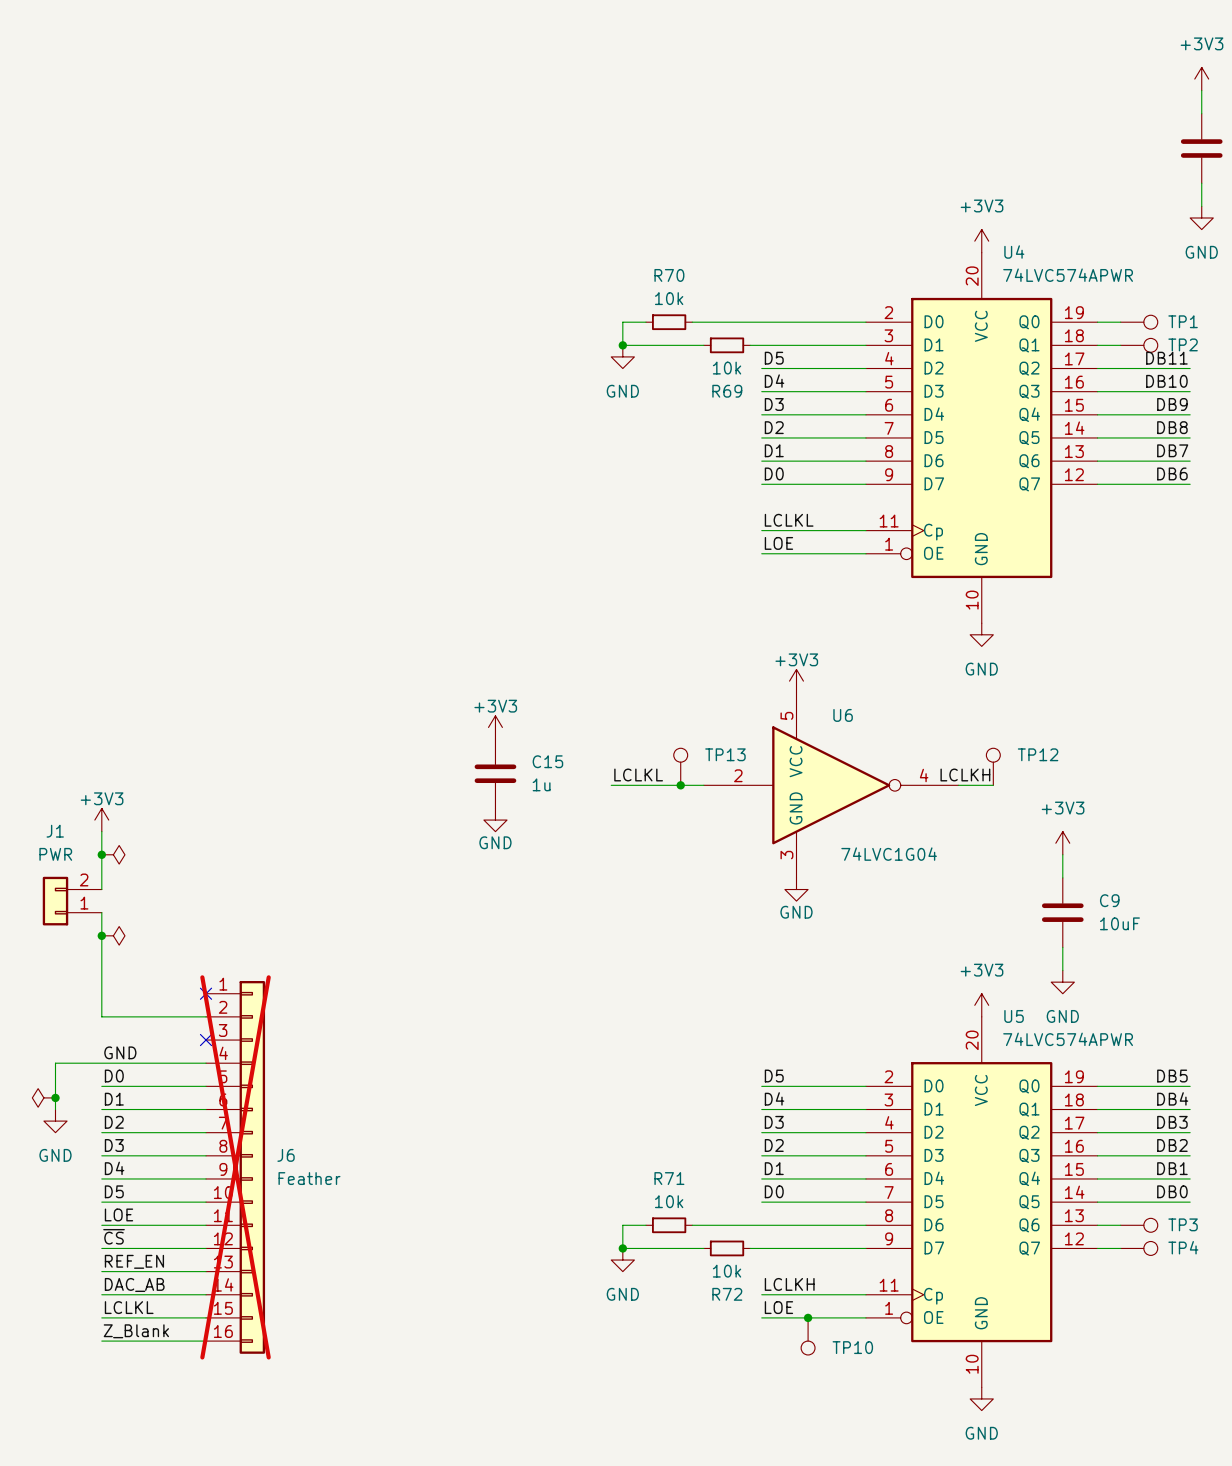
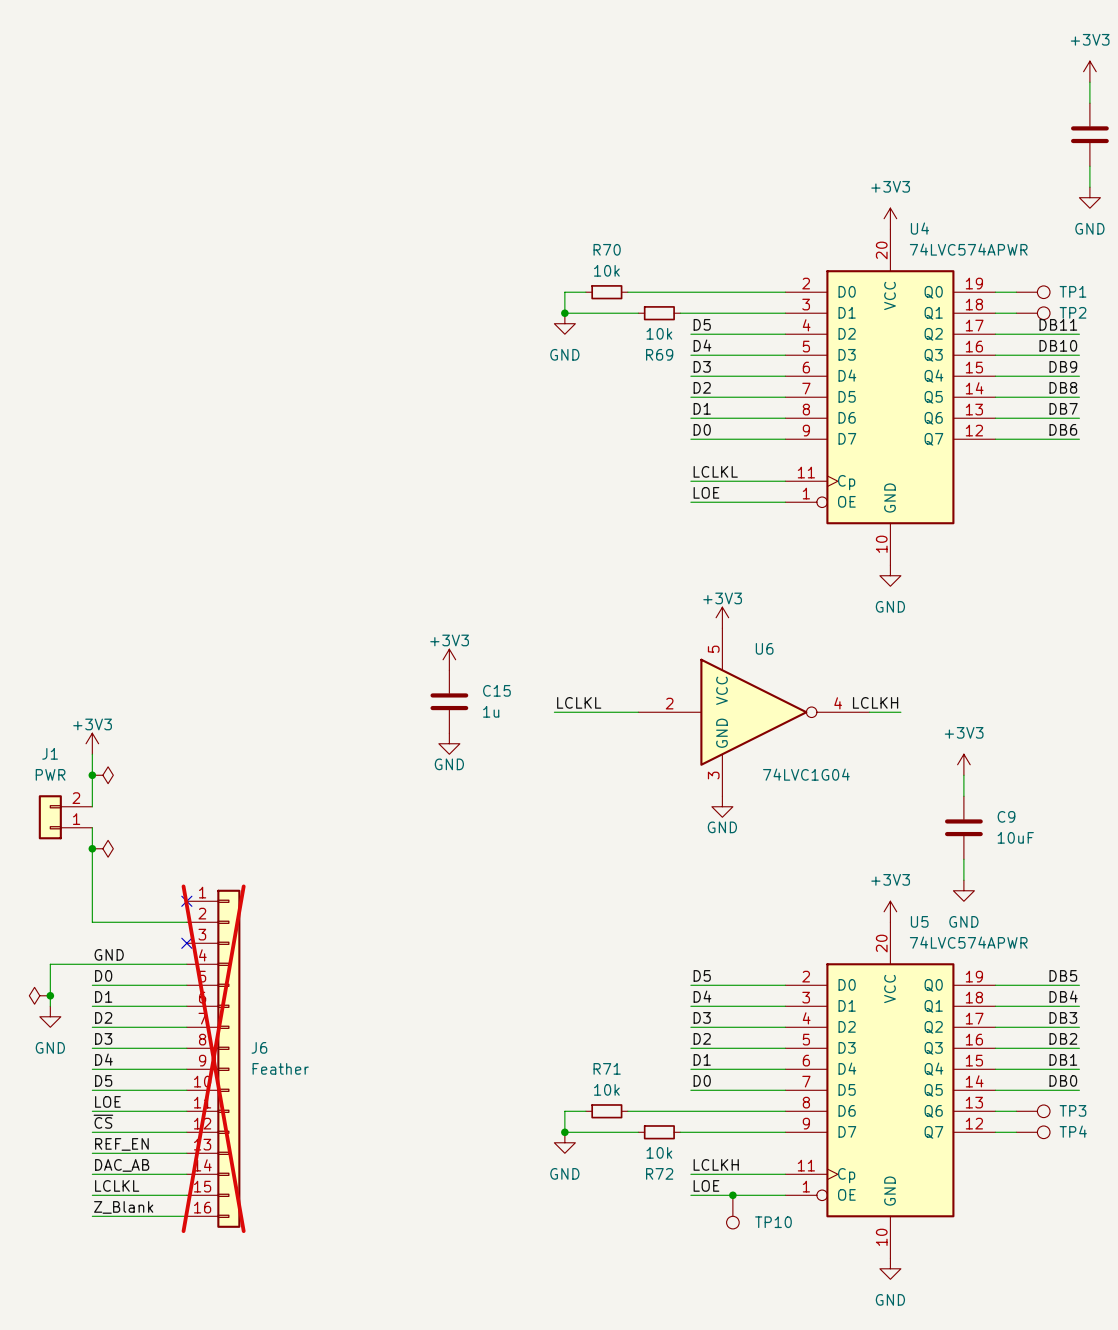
TP13: (680, 766) -> none
TP12: (993, 766) -> none
junction: (680, 785) -> none

